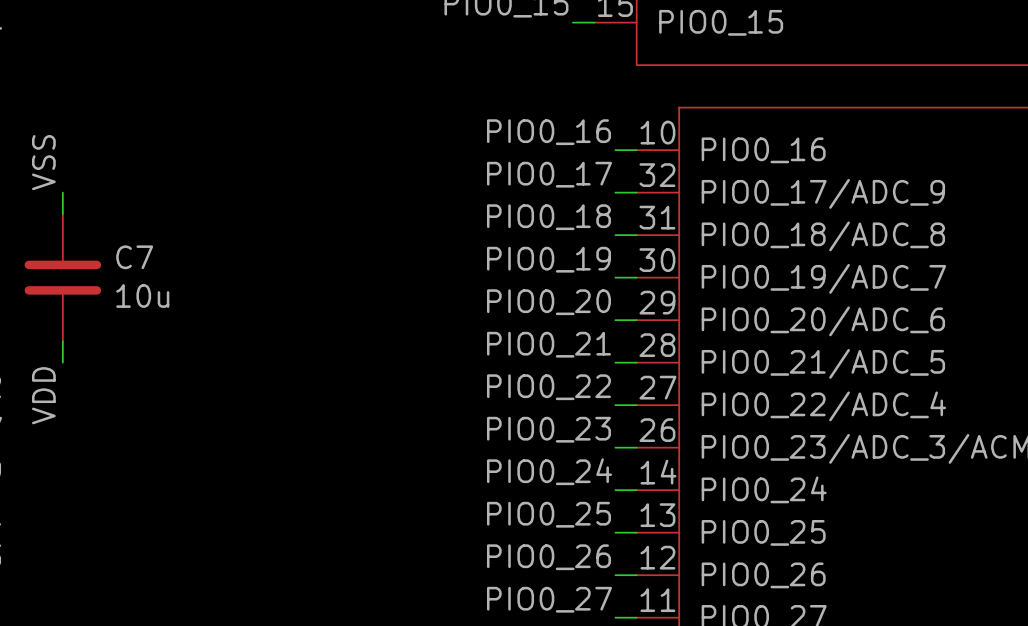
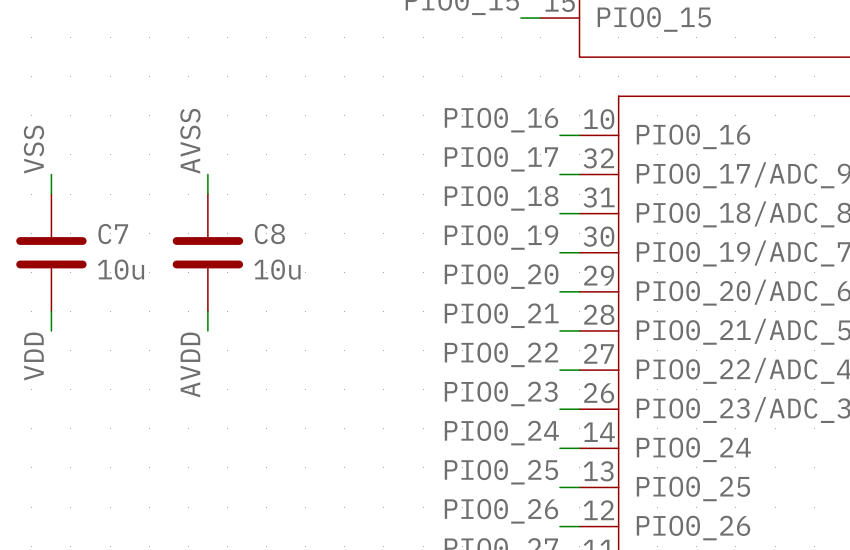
label: none -> AVSS (190, 141)
wire: none -> (207, 174) (207, 194)
C8: none -> 10u (207, 252)
wire: none -> (207, 311) (207, 330)
label: none -> AVDD (190, 364)

